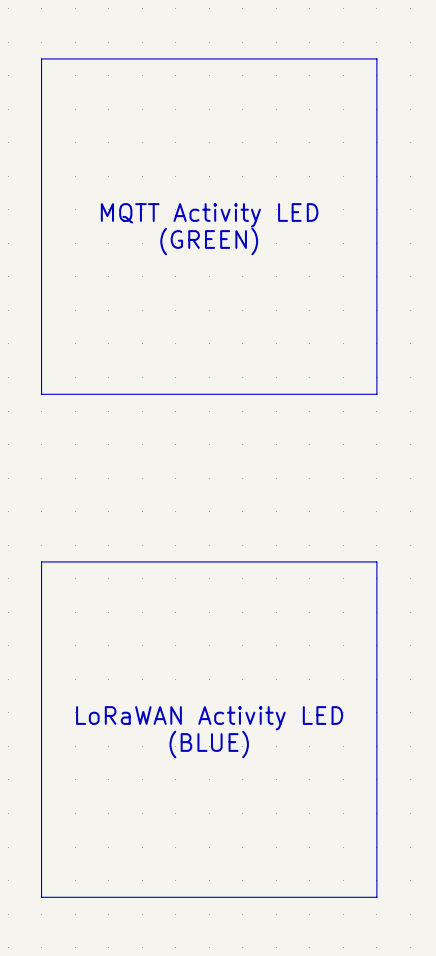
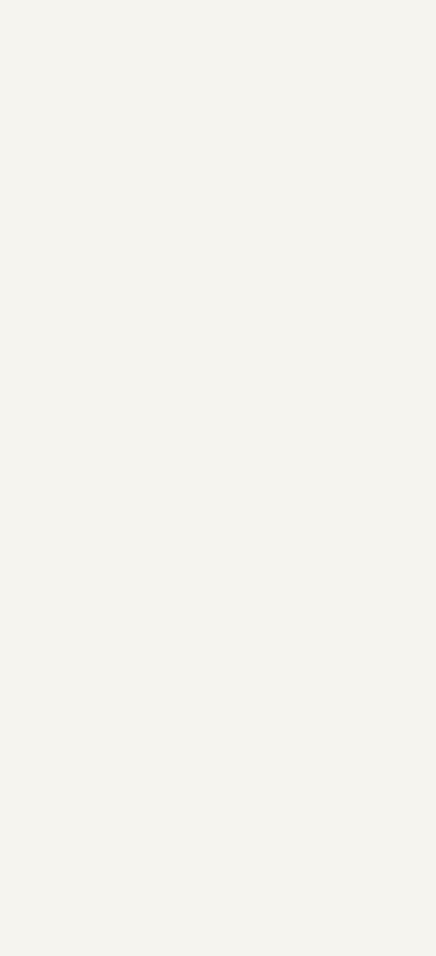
line: (41, 58) (376, 58) (376, 394) (41, 394) (41, 58) -> none
text: MQTT Activity LED (209, 215) -> none
text: (GREEN) (209, 241) -> none
line: (41, 561) (41, 897) (376, 897) (376, 561) (41, 561) -> none
text: LoRaWAN Activity LED (209, 718) -> none
text: (BLUE) (209, 744) -> none

